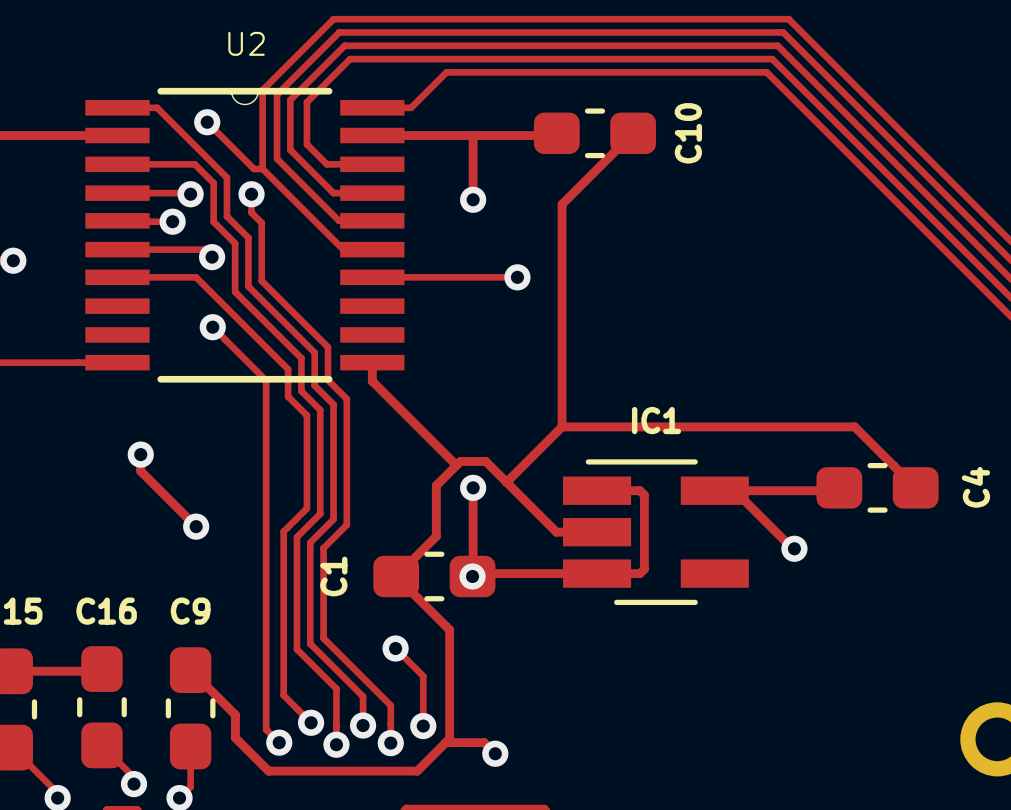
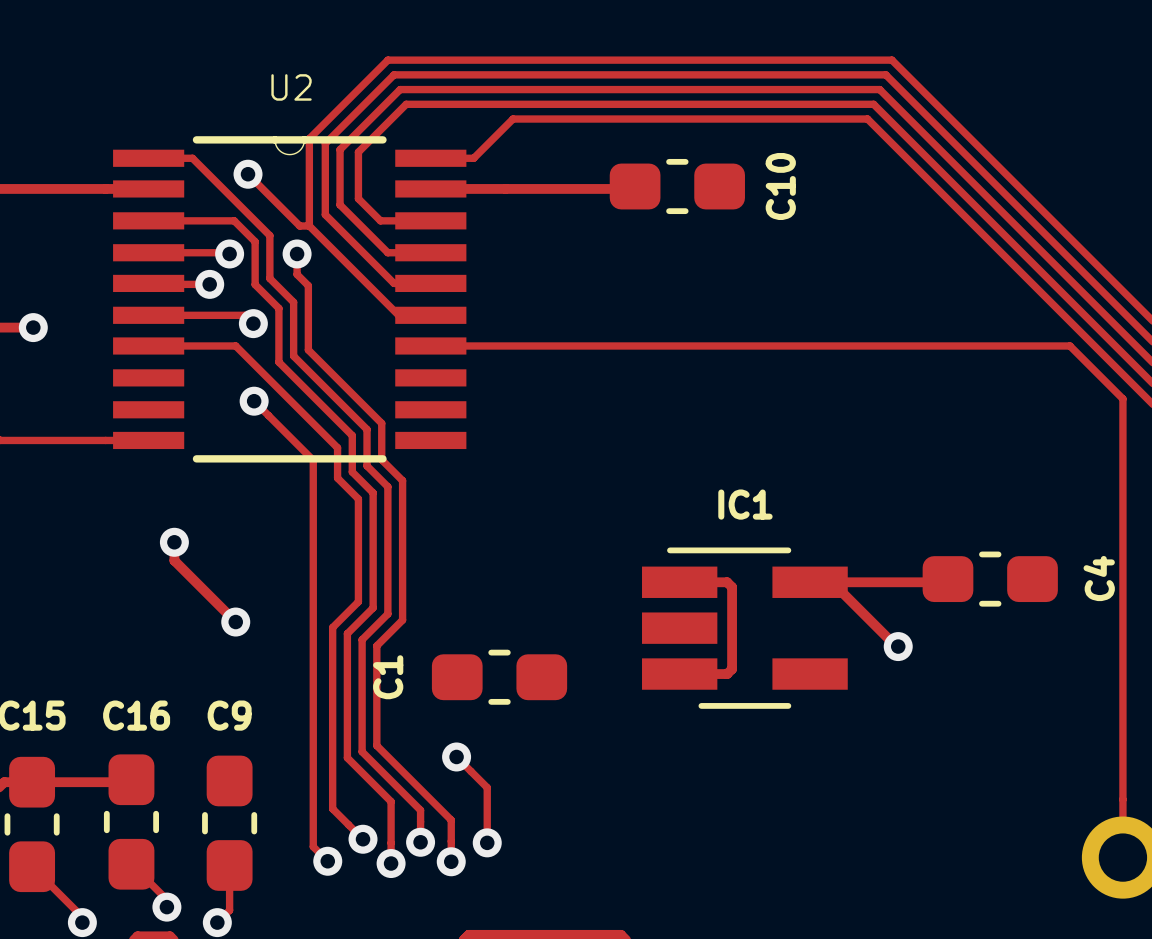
track: (633, 133) (562, 204) (562, 426) -> none
track: (473, 135) (473, 199) -> none
via: (473, 199) -> none
track: none -> (591, 345) (1069, 345) (1122, 398) (1122, 857)
via: (517, 277) -> none
track: (372, 362) (372, 381) (456, 465) -> none
track: (562, 426) (854, 426) (915, 487) -> none
track: (562, 426) (506, 482) -> none
track: (473, 487) (473, 575) -> none
via: (473, 487) -> none
track: (597, 532) (556, 532) (485, 461) (460, 461) (436, 485) (436, 536) (396, 576) (449, 629) (449, 738) (417, 771) (268, 771) (235, 737) (235, 714) (190, 670) -> none
track: (597, 573) (475, 573) (472, 576) -> none
via: (472, 576) -> none
track: (445, 742) (484, 742) (495, 753) -> none
via: (495, 753) -> none

